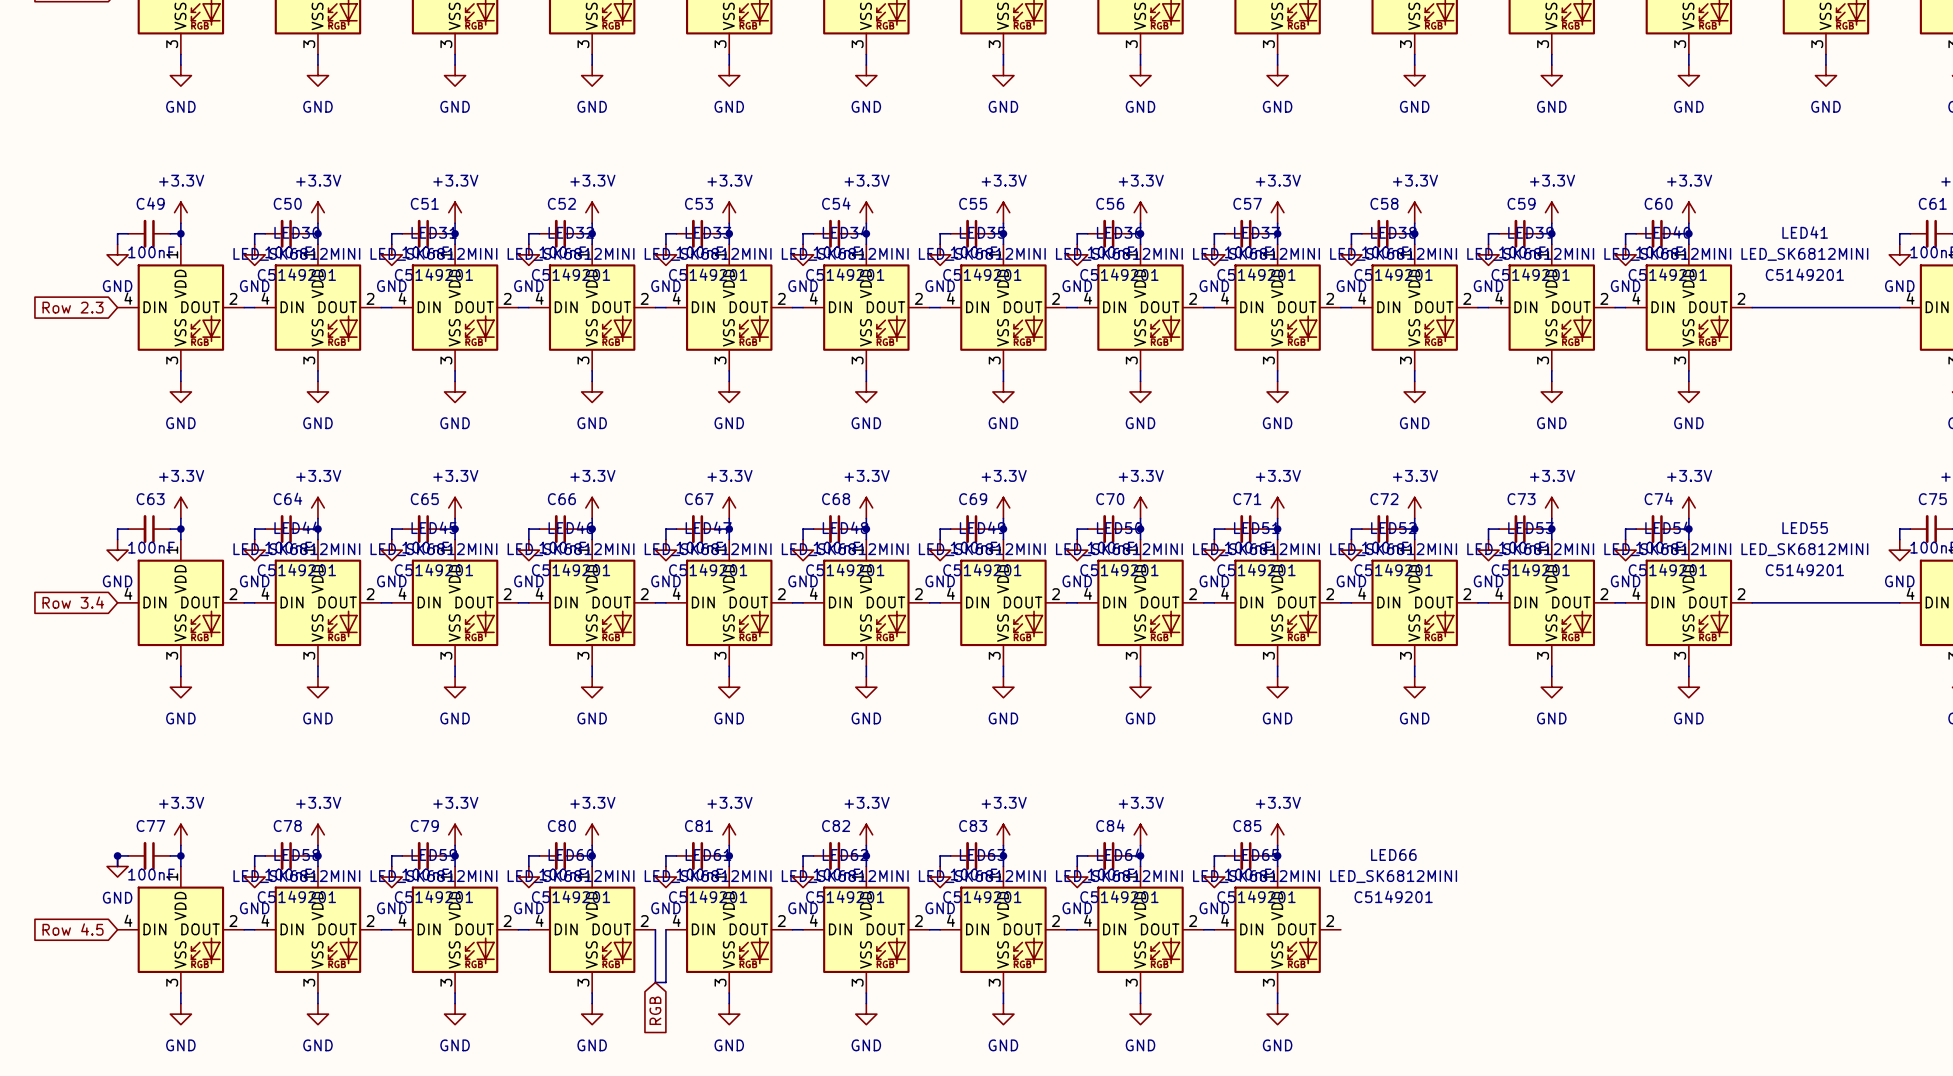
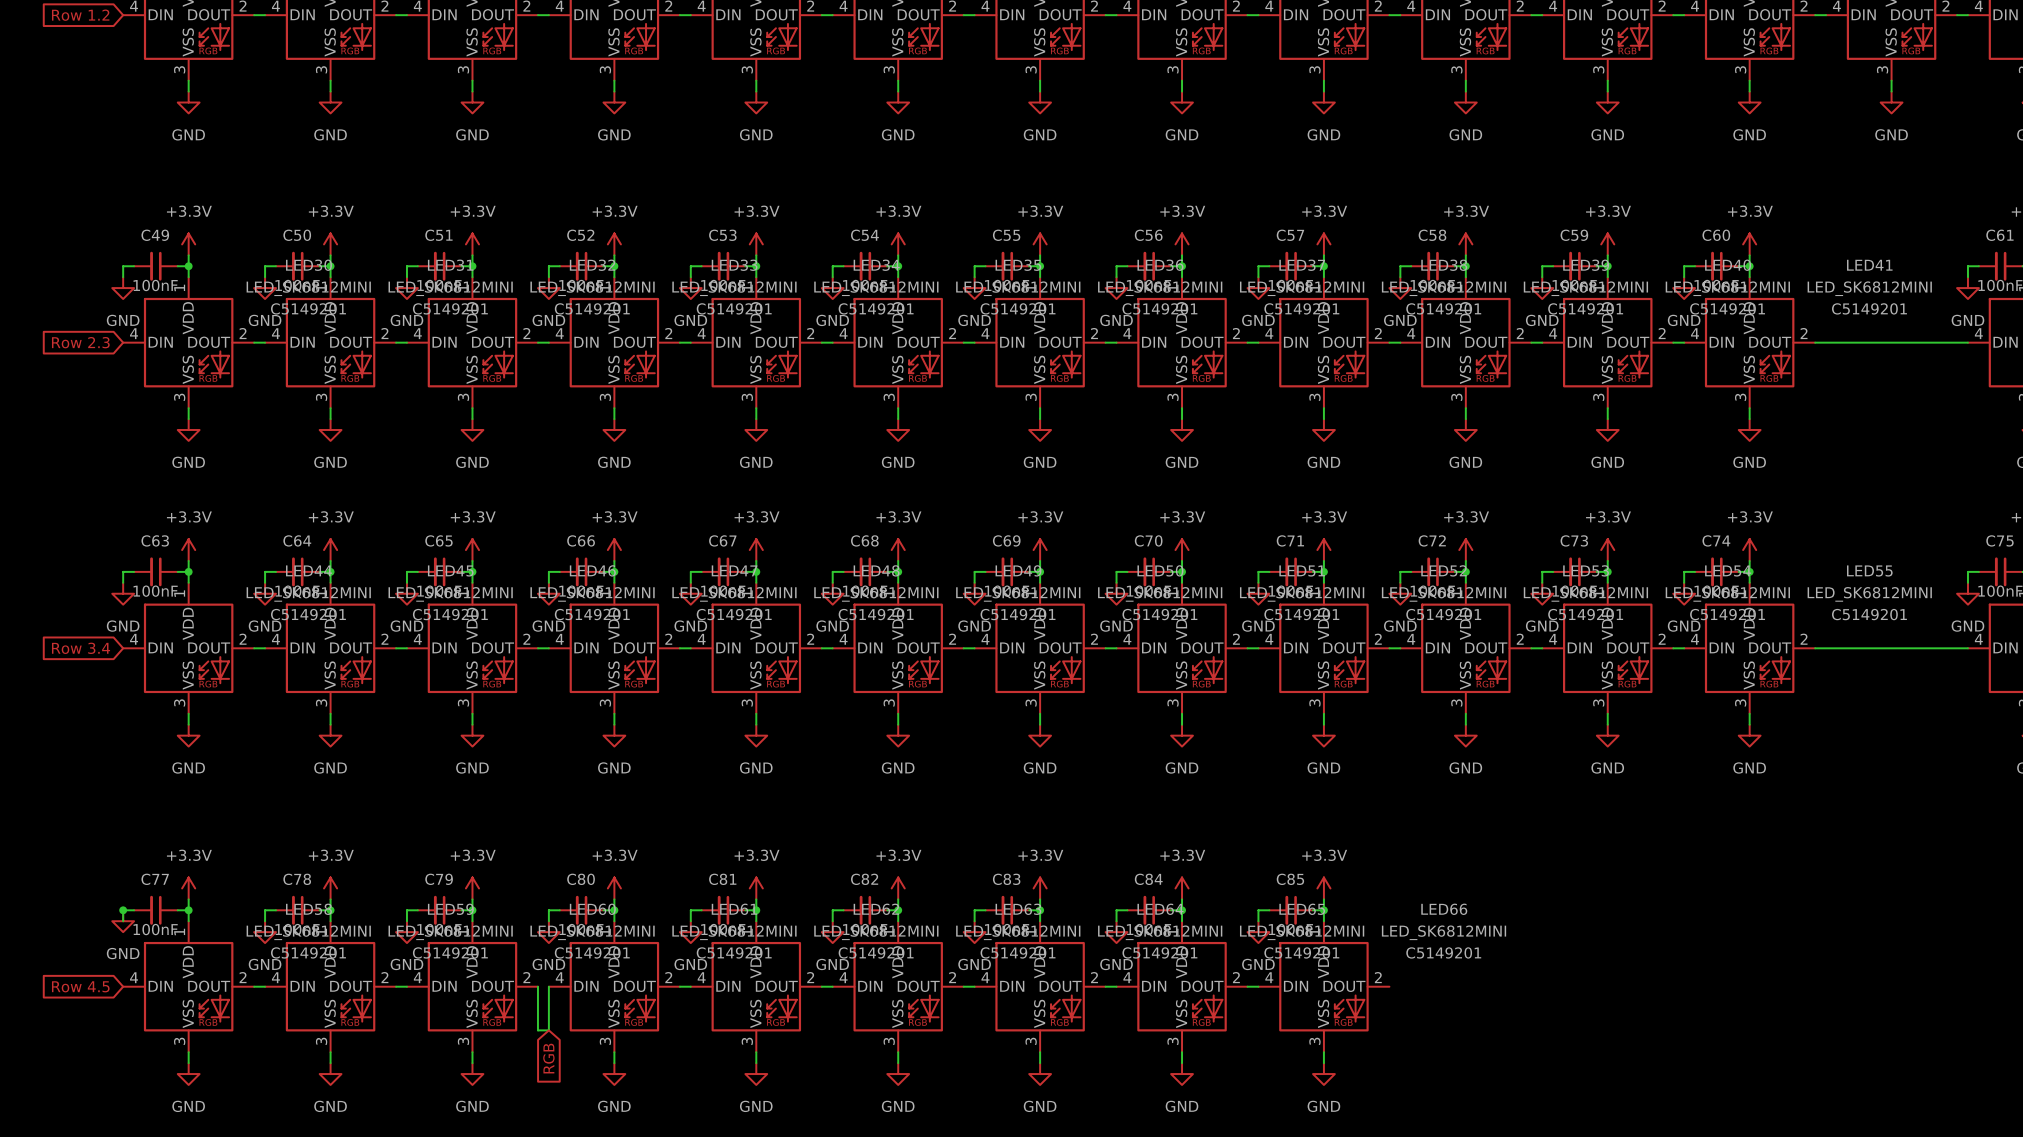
wire: (518, 929) (528, 929) -> (537, 986) (537, 1030) (548, 1030) (548, 986)
wire: (655, 929) (655, 982) (665, 982) (665, 929) -> (679, 986) (690, 986)
global label position: RGB (655, 1010) -> RGB (548, 1058)

